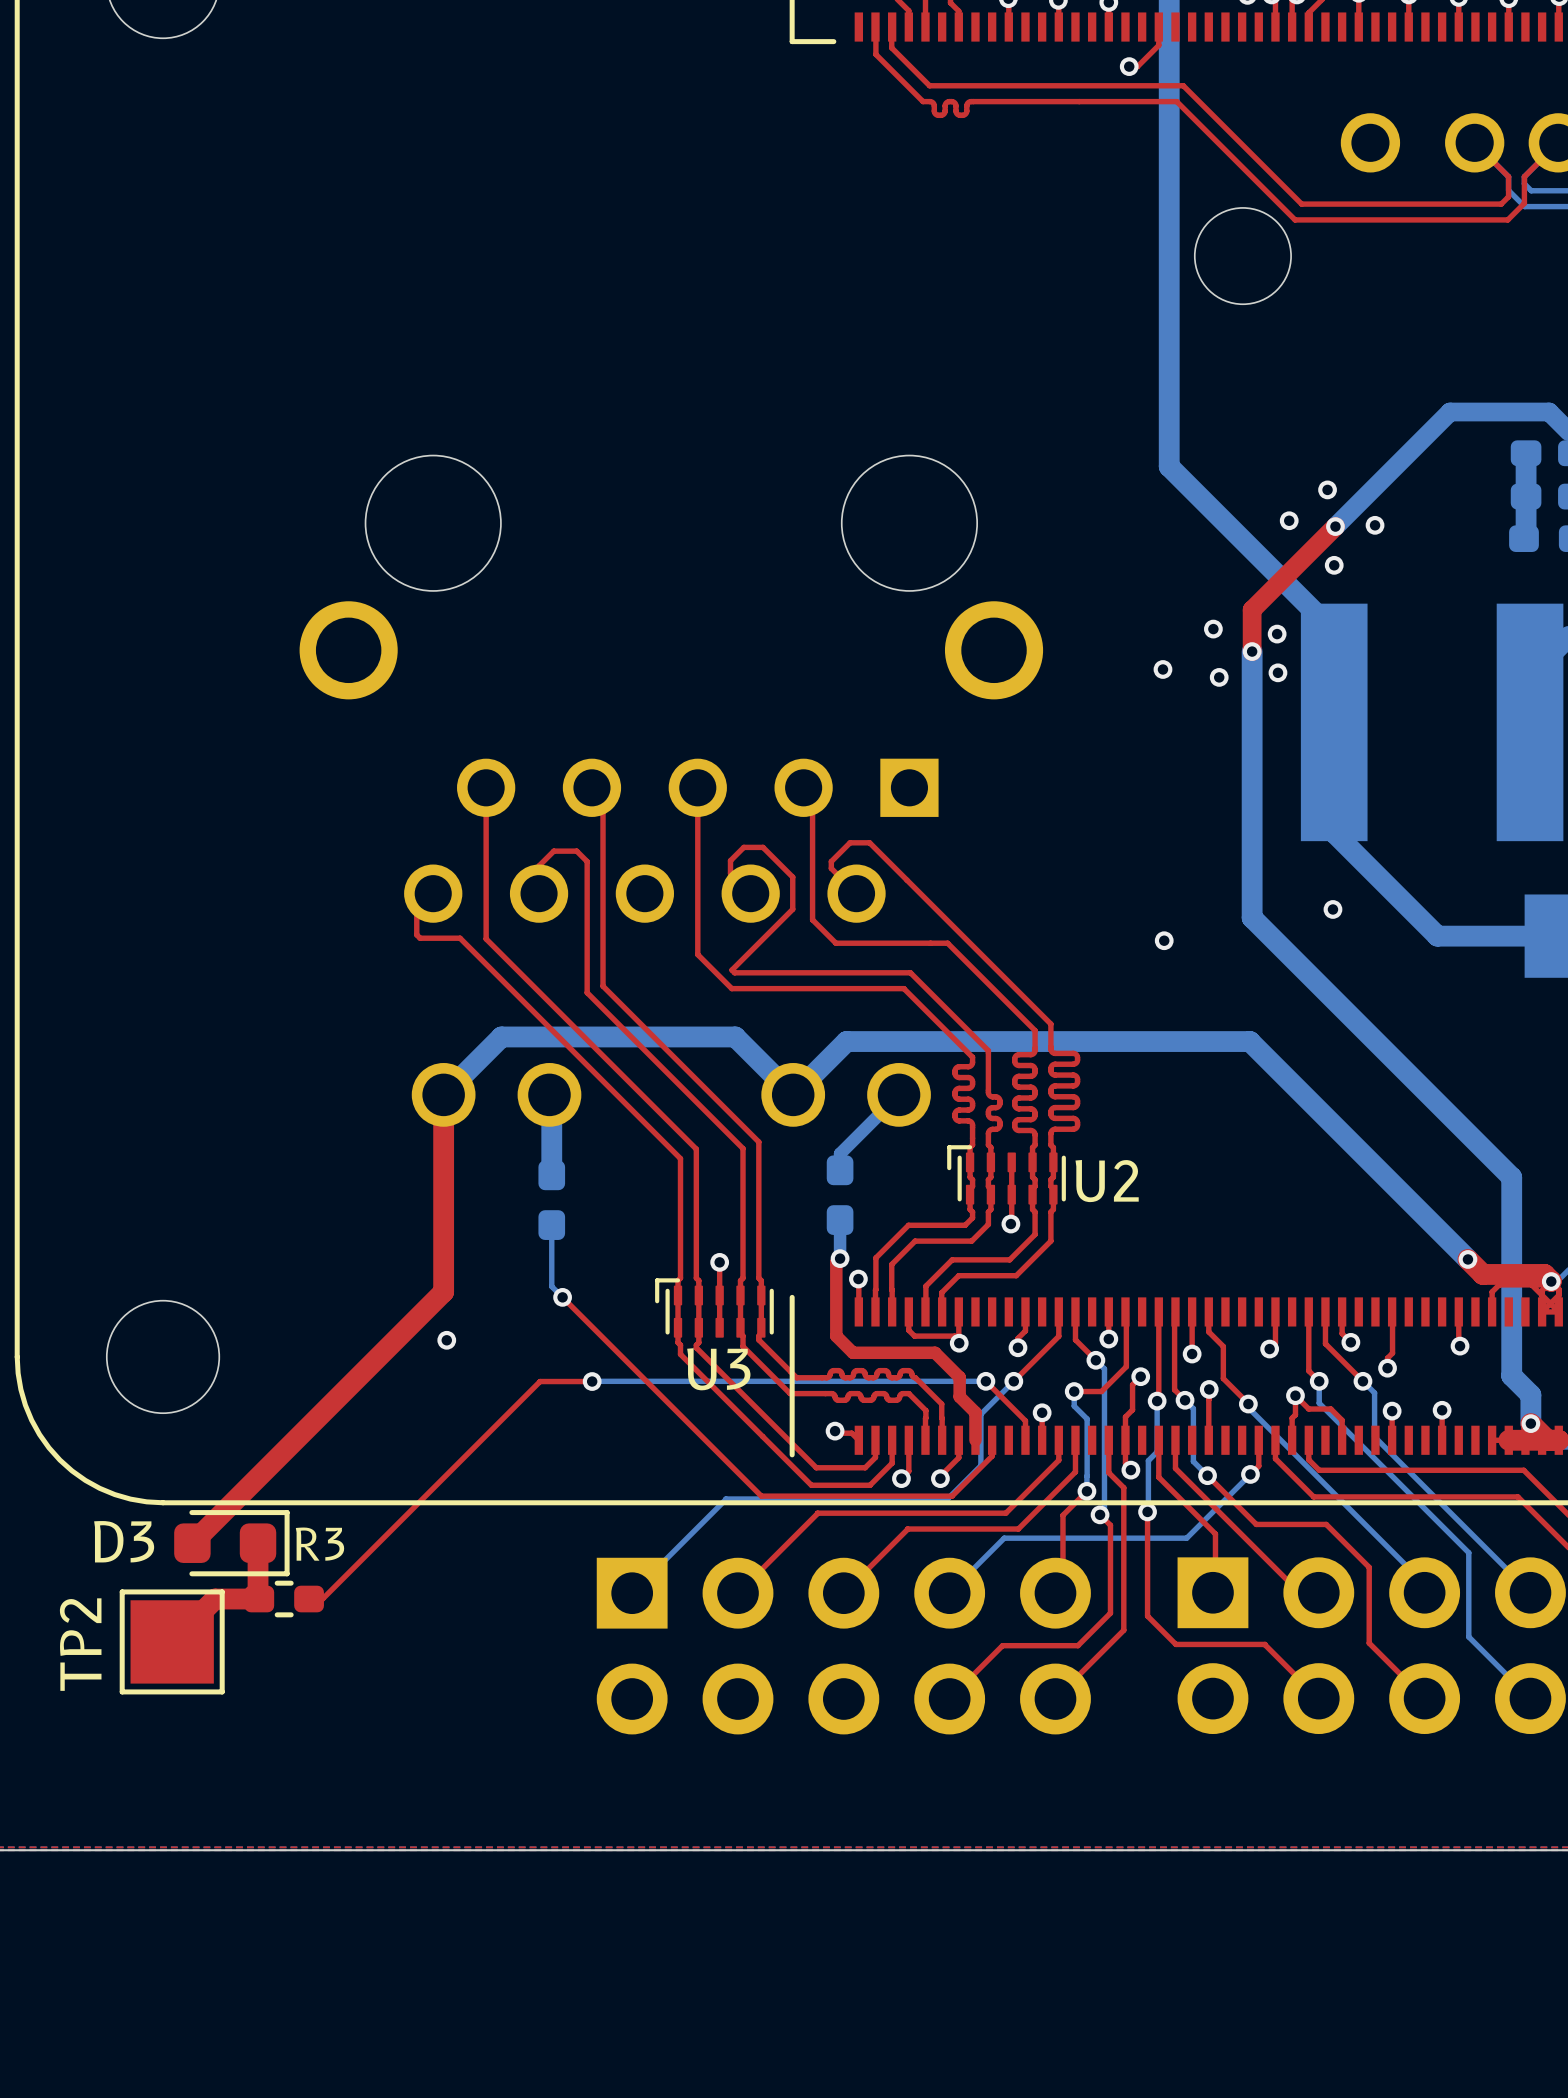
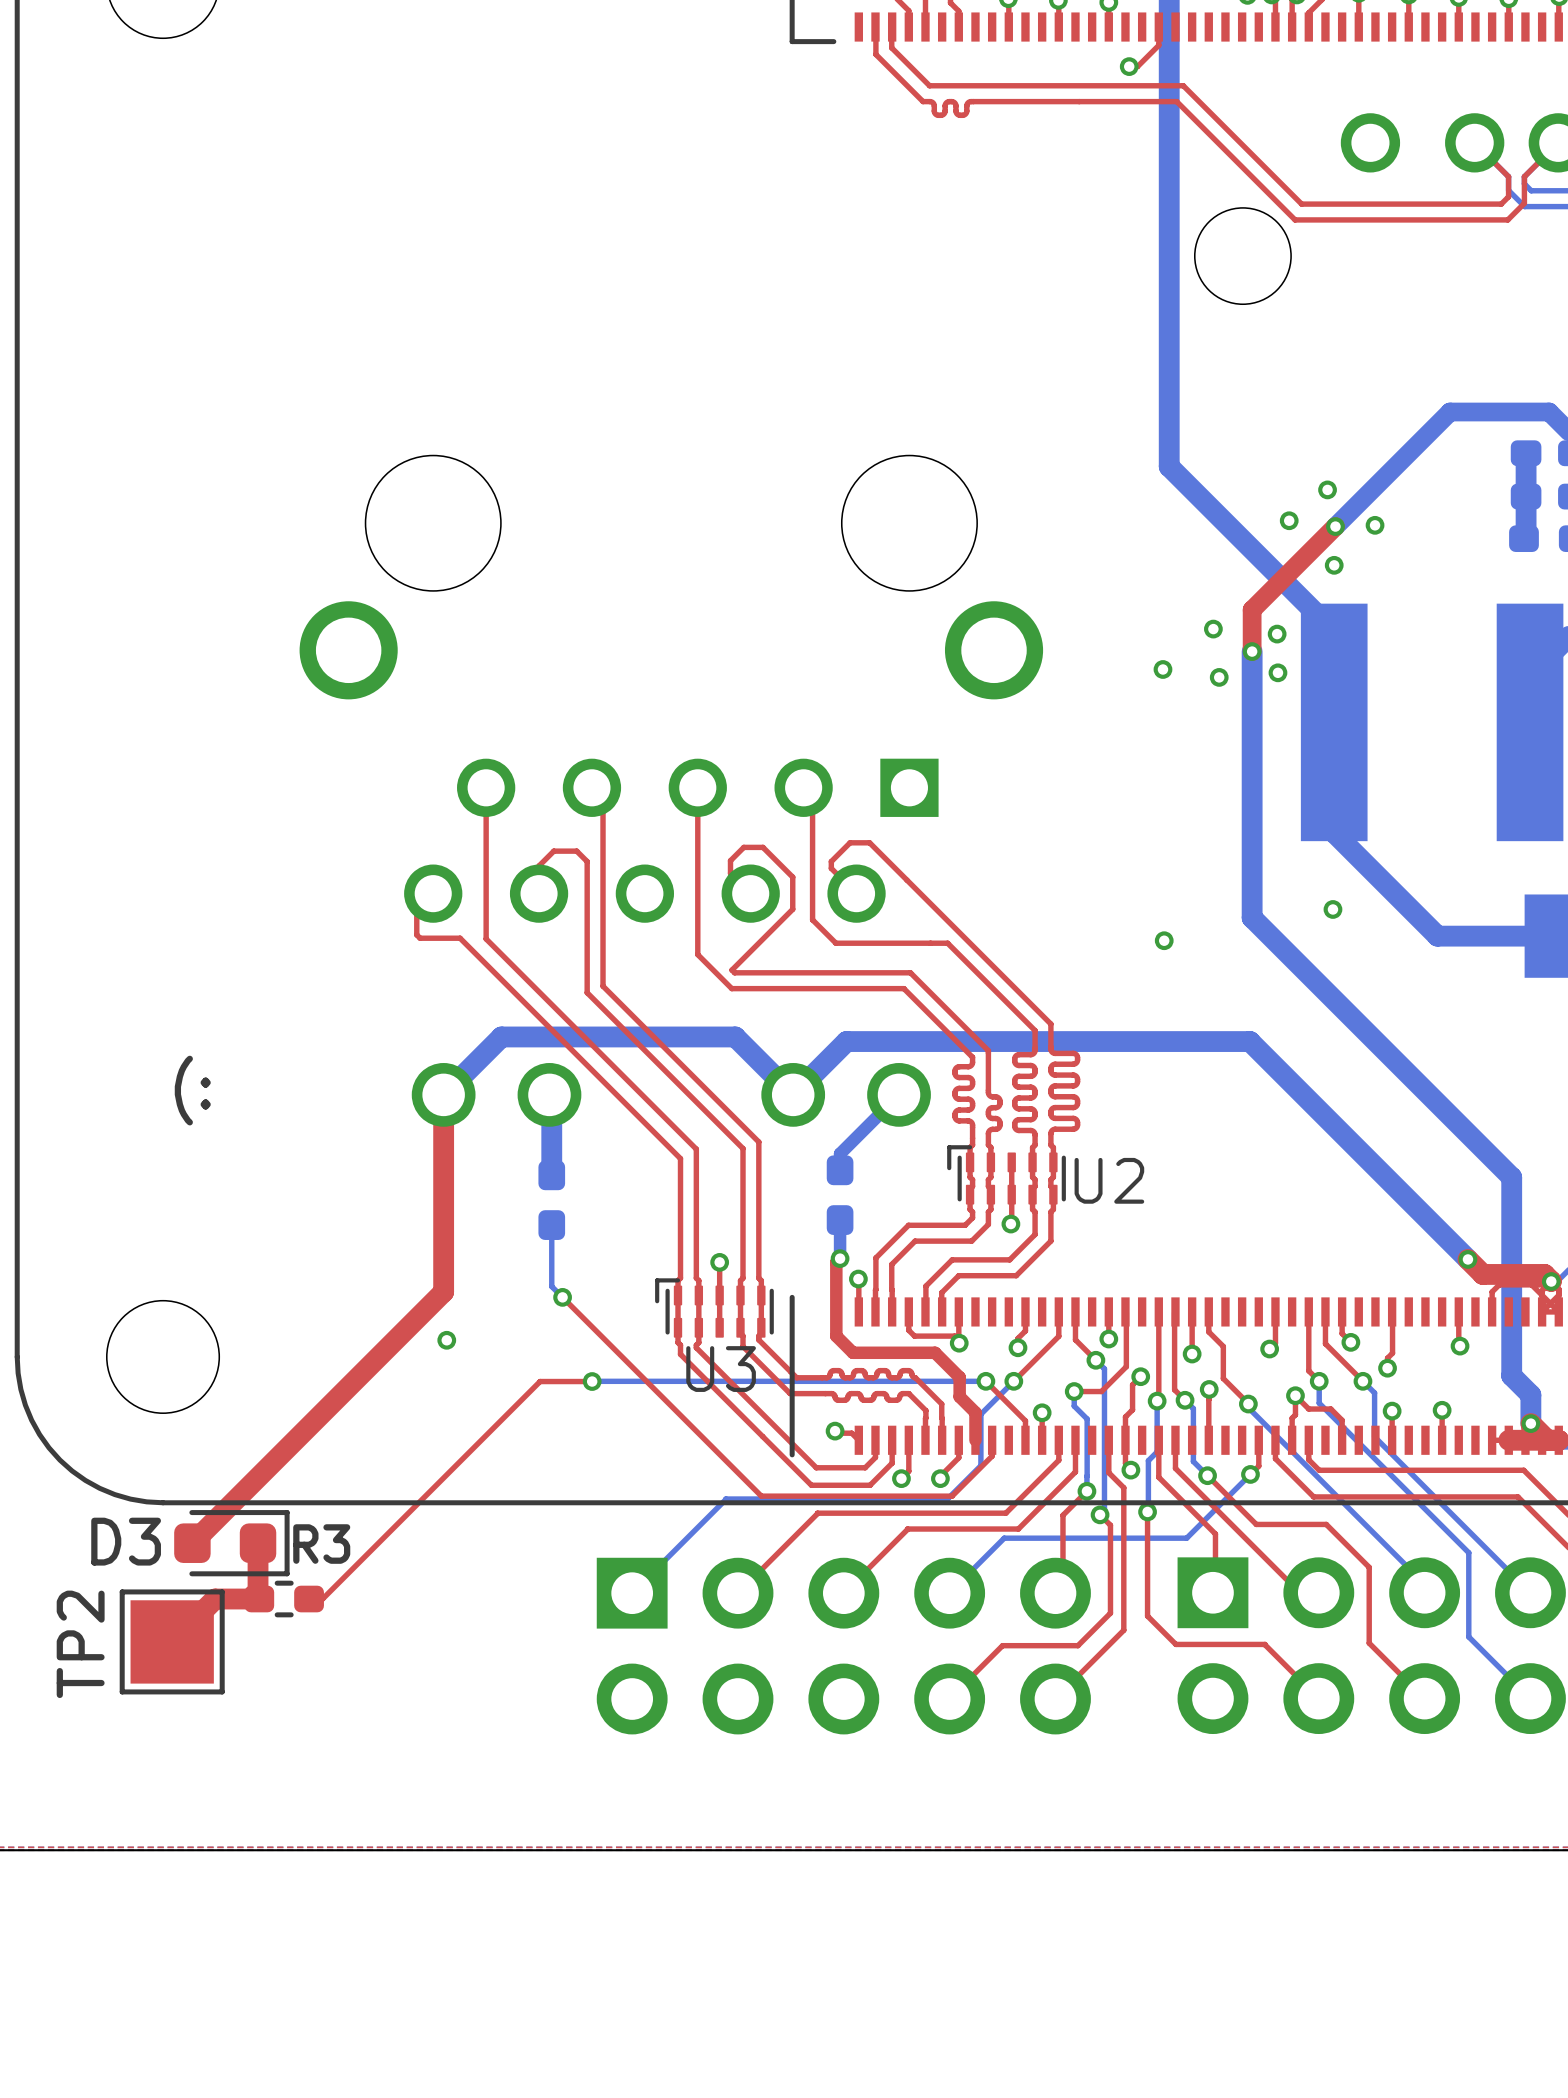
text: none -> (: (192, 1090)

